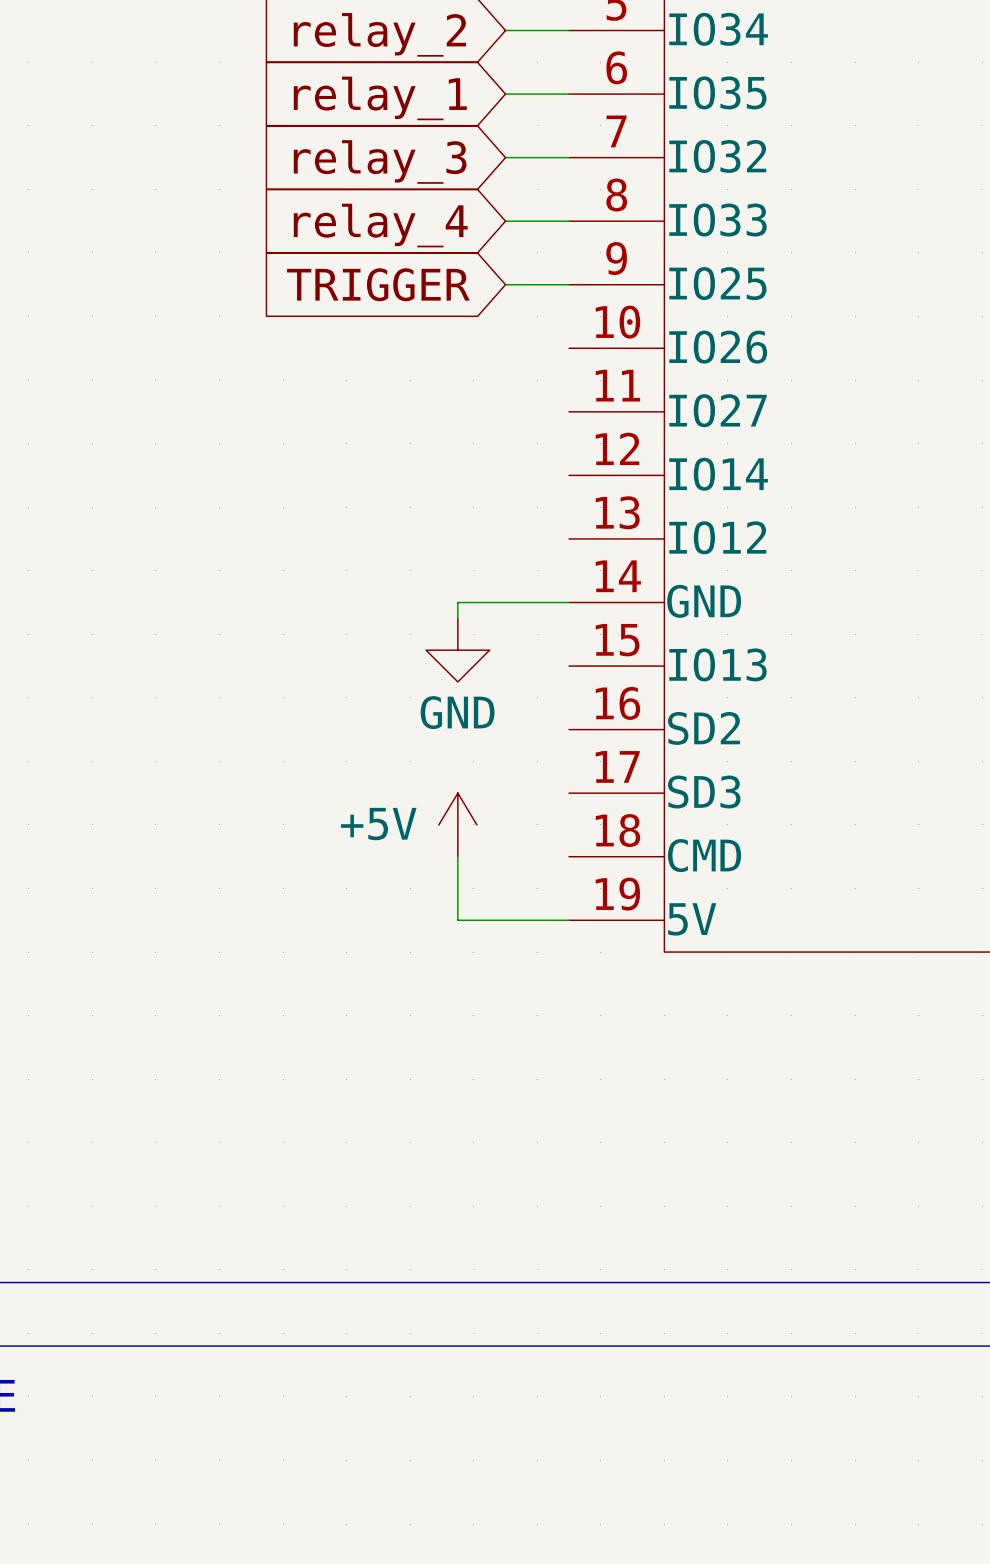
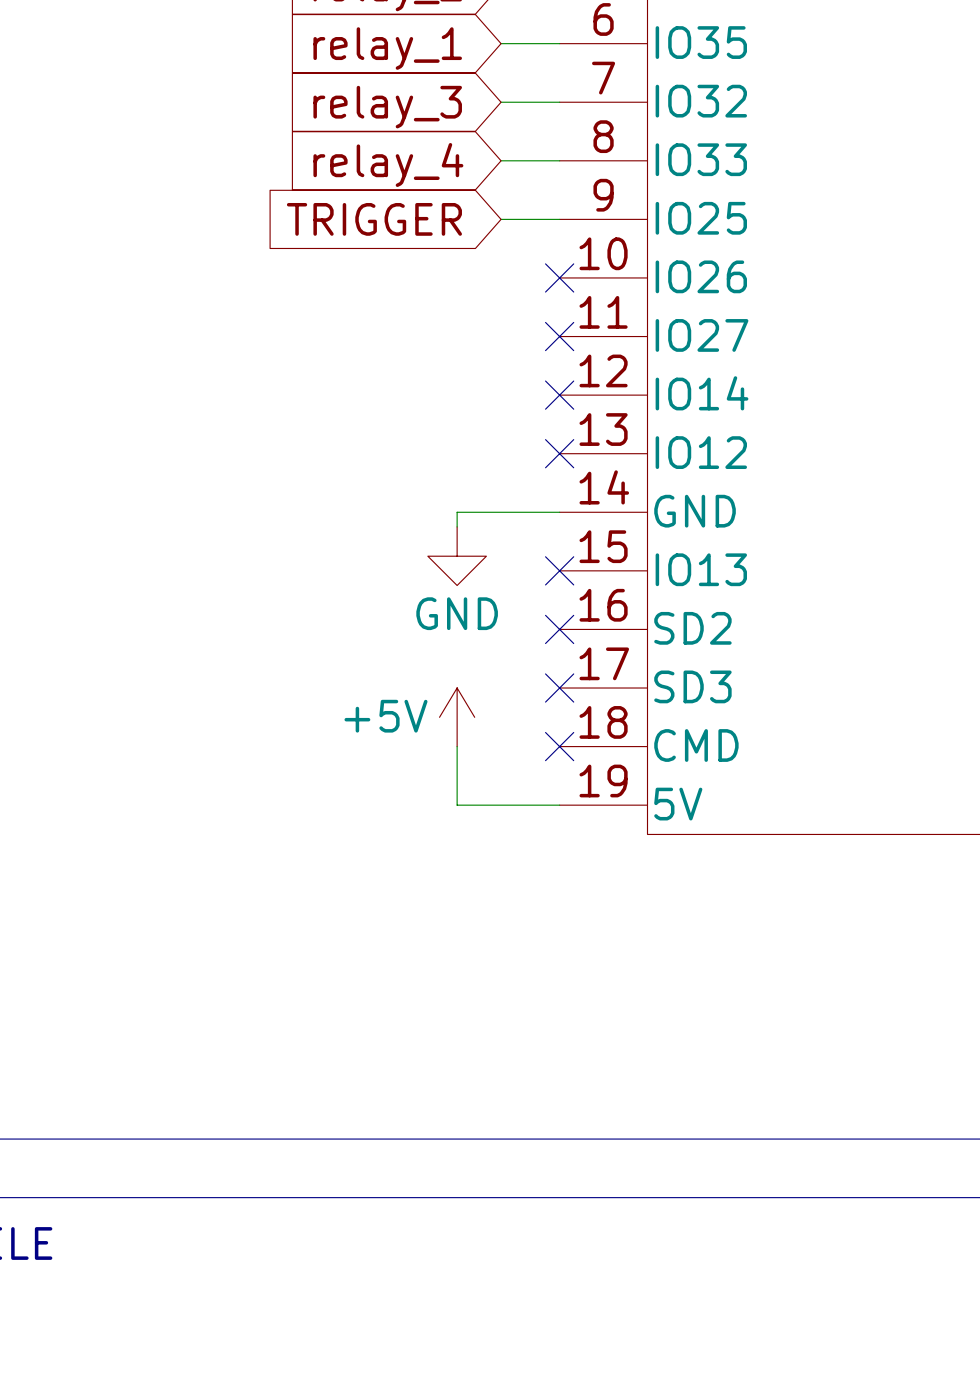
no-connect mark: none -> (559, 277)
no-connect mark: none -> (559, 336)
no-connect mark: none -> (559, 395)
no-connect mark: none -> (559, 453)
no-connect mark: none -> (559, 570)
no-connect mark: none -> (559, 629)
no-connect mark: none -> (559, 688)
no-connect mark: none -> (559, 746)

